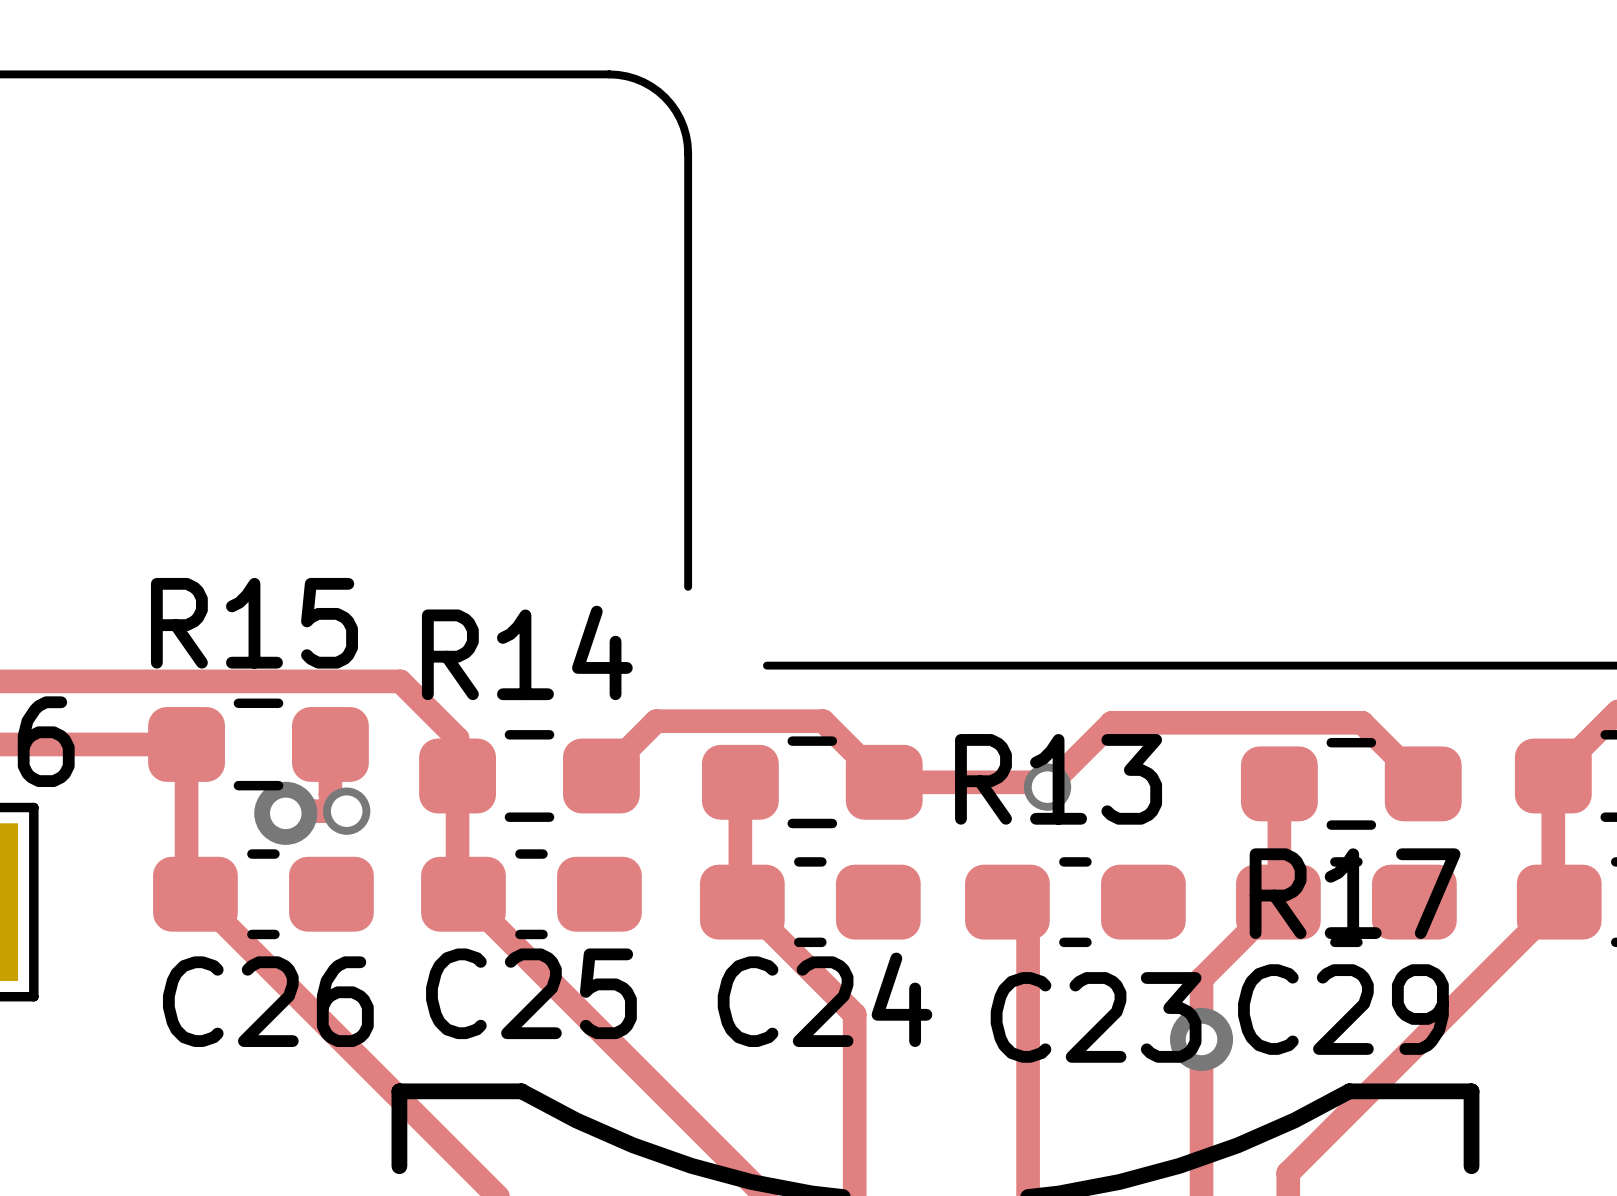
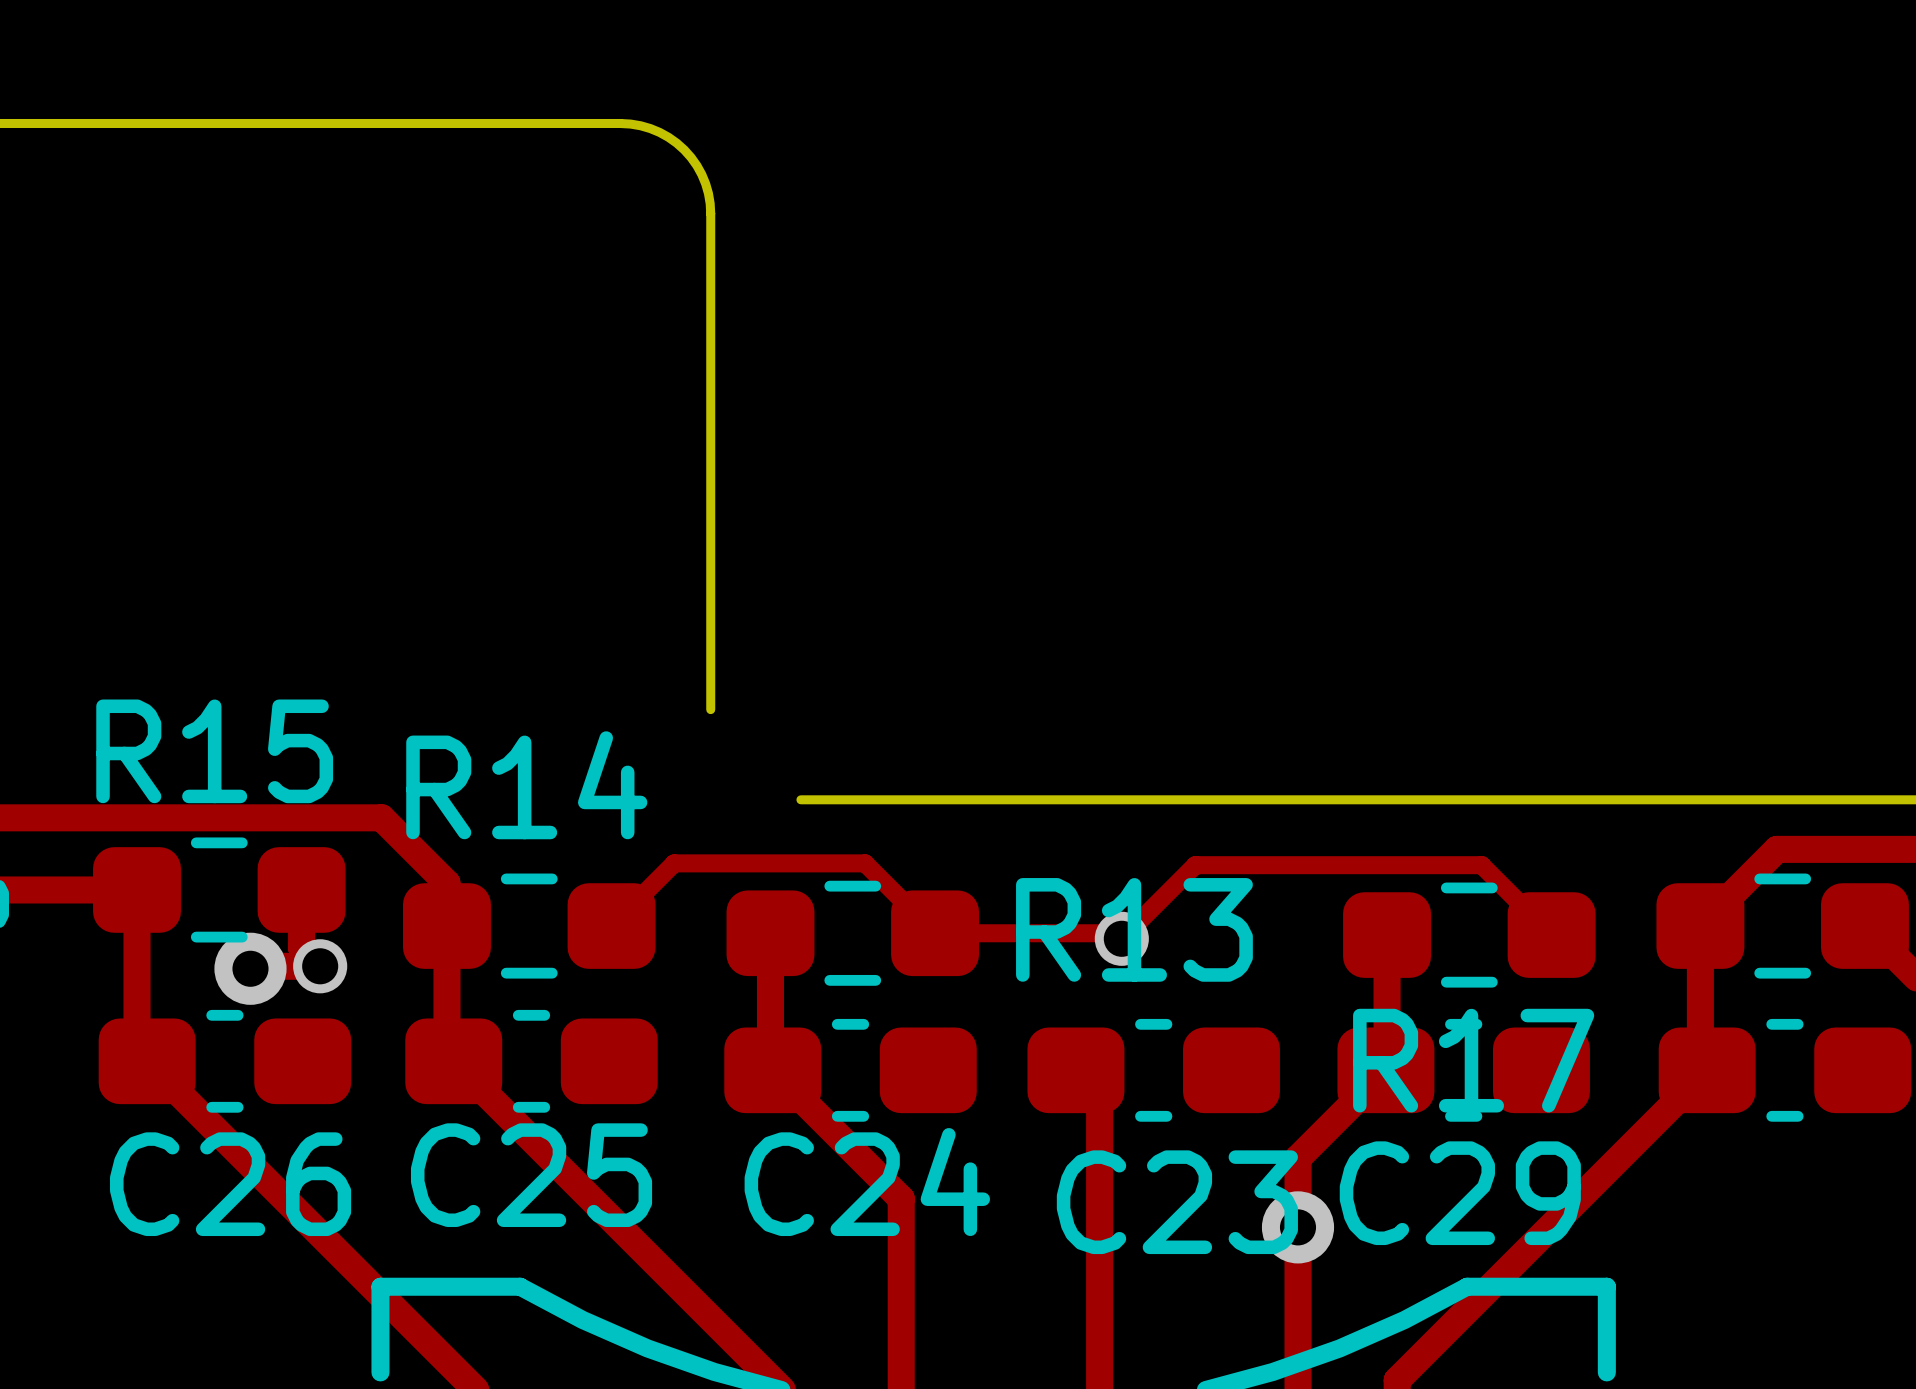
track width: thick (601, 776) (656, 721) (823, 721) (884, 782) (1042, 782) (1047, 787) (1111, 722) (1362, 722) (1423, 783) -> thin (611, 926) (674, 863) (865, 863) (935, 933) (1116, 933) (1121, 938) (1195, 865) (1481, 865) (1551, 935)

